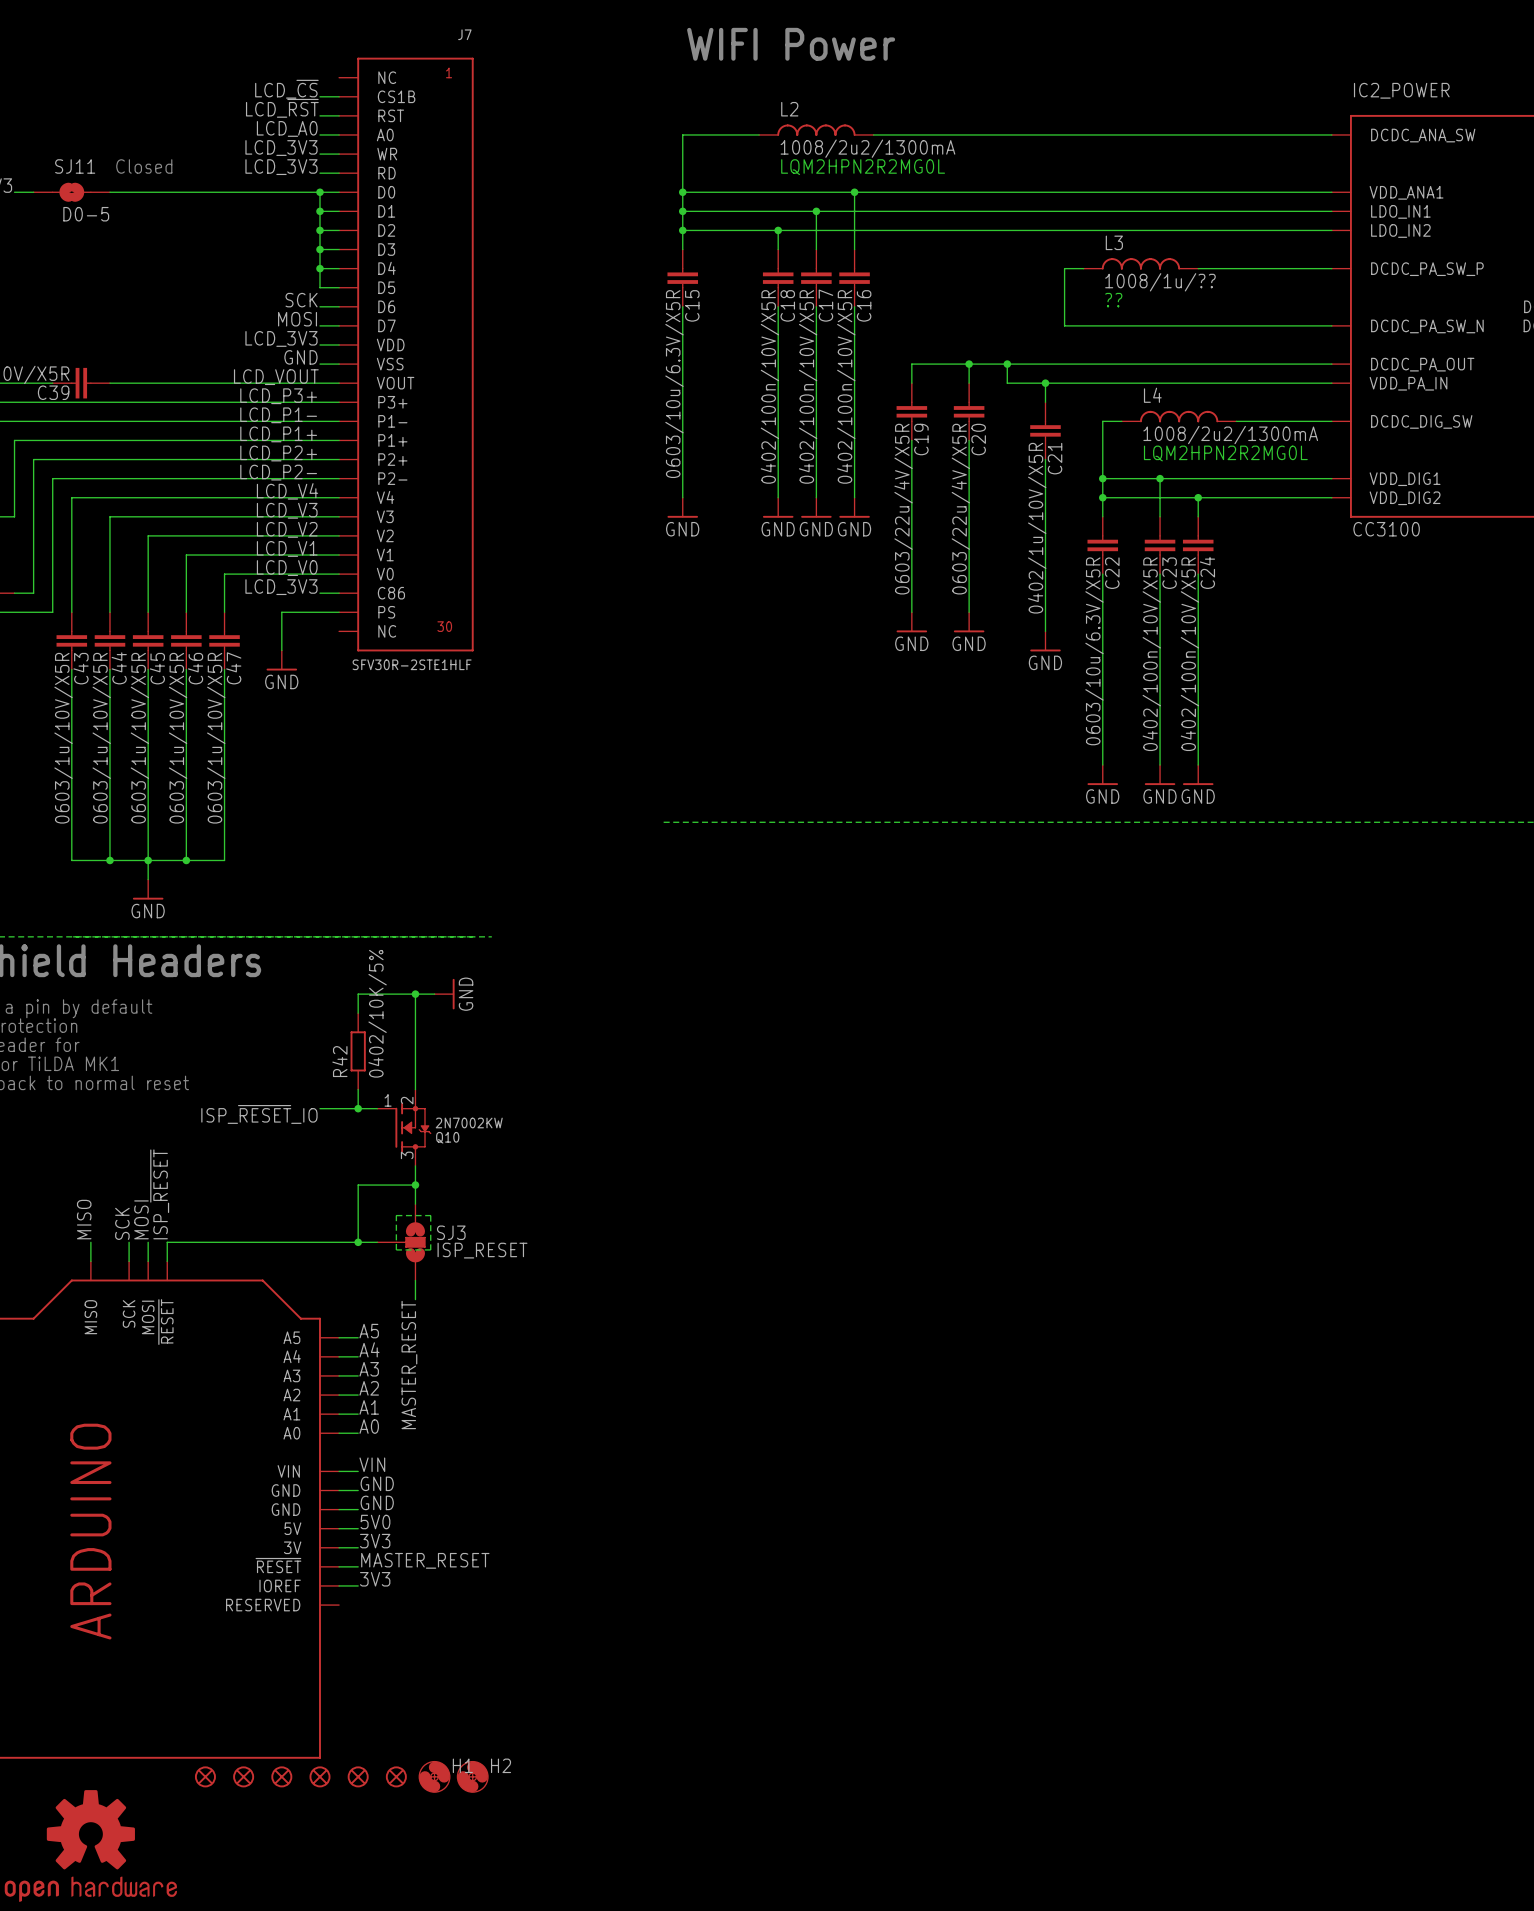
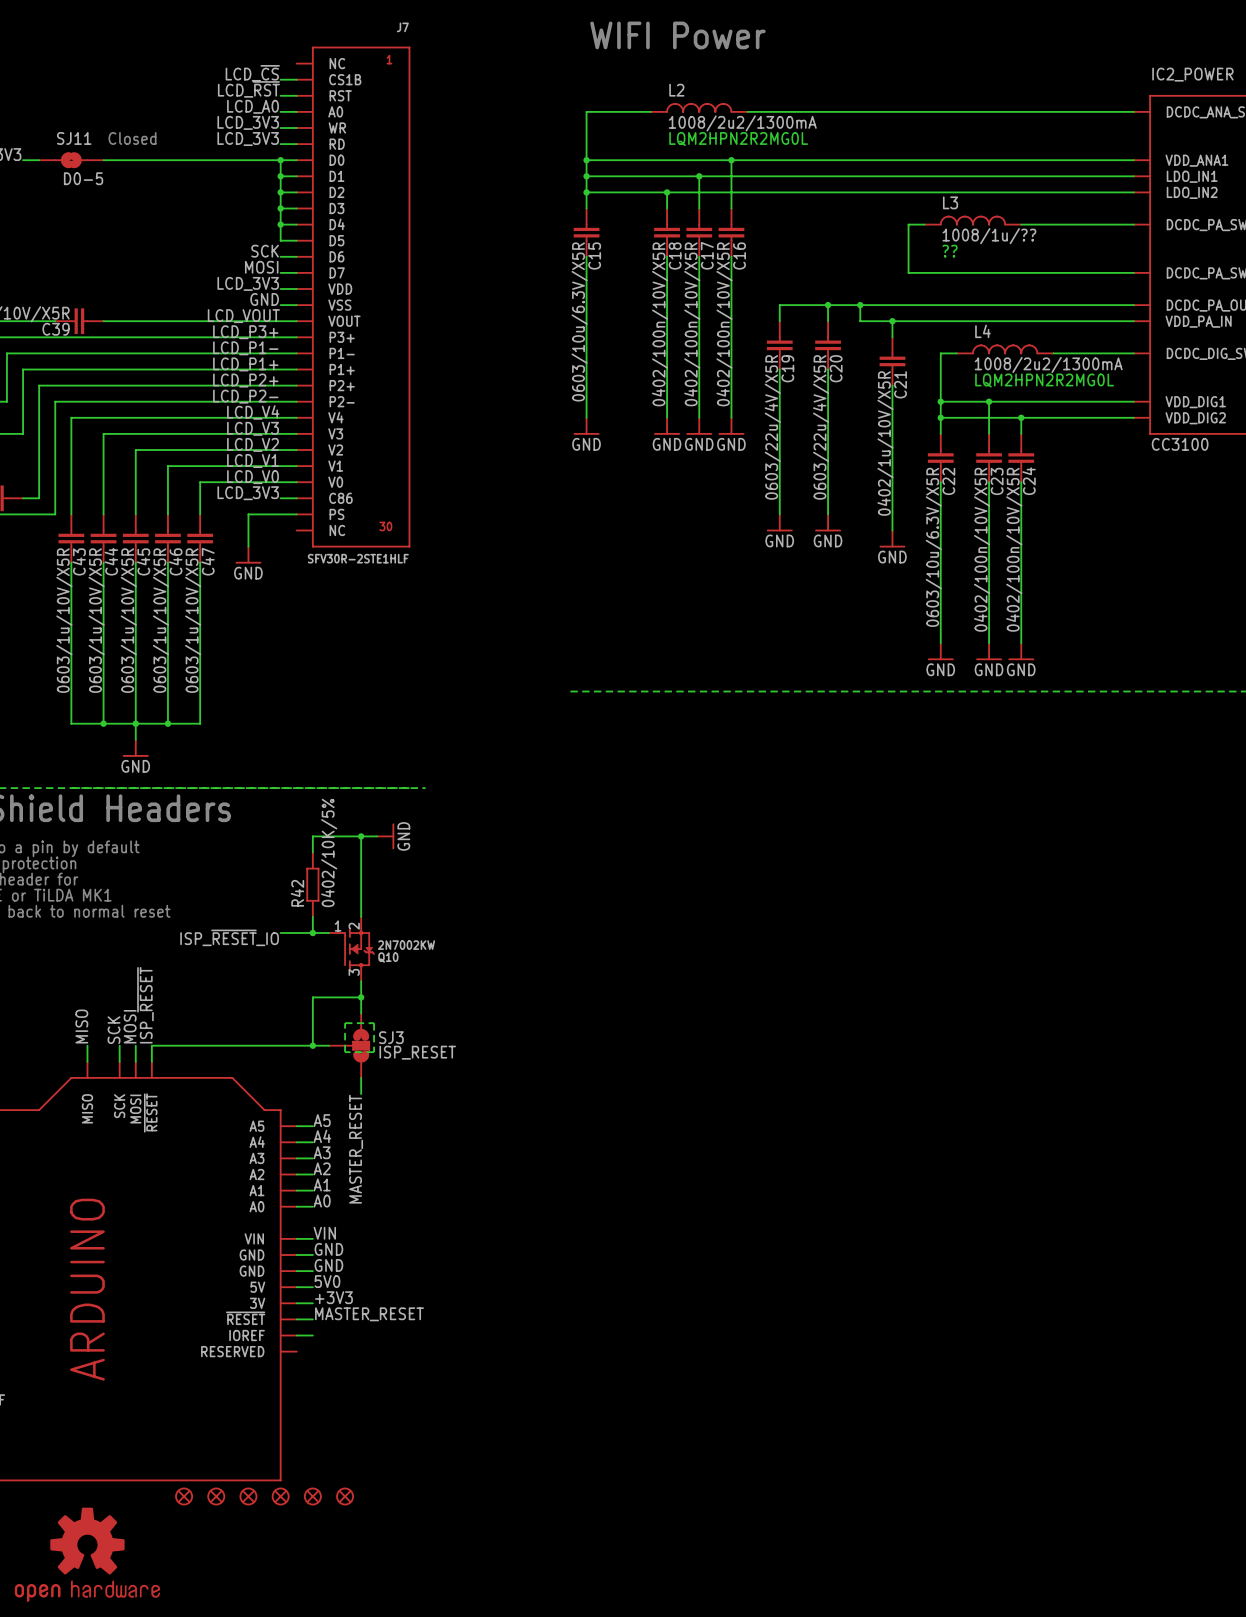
label: 3V3 (375, 1541) -> +3V3 (333, 1297)
label: 3V3 (375, 1579) -> none
H1: (434, 1776) -> none
H2: (472, 1776) -> none

